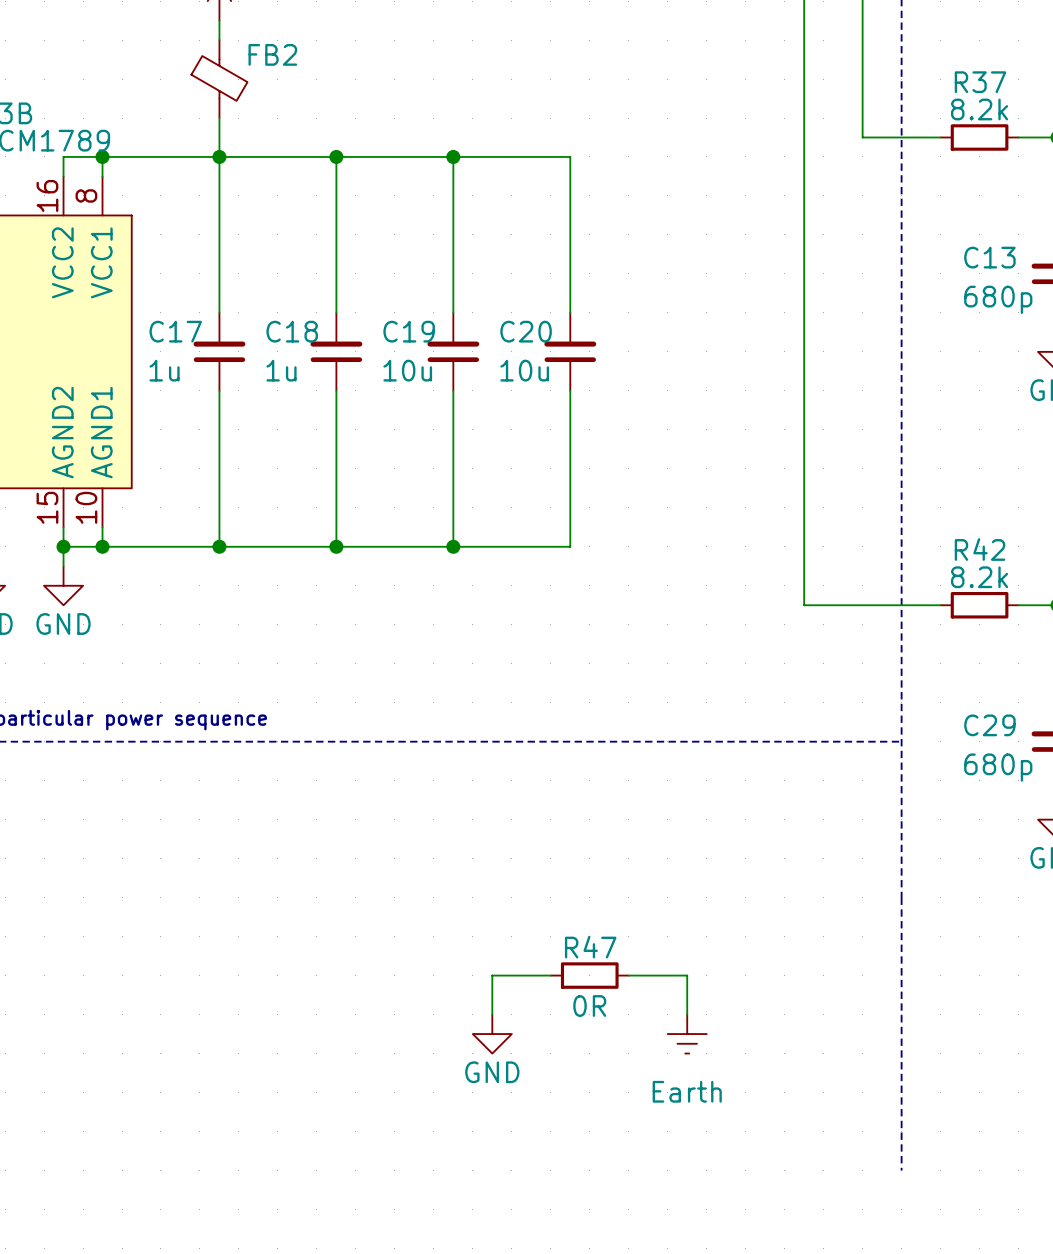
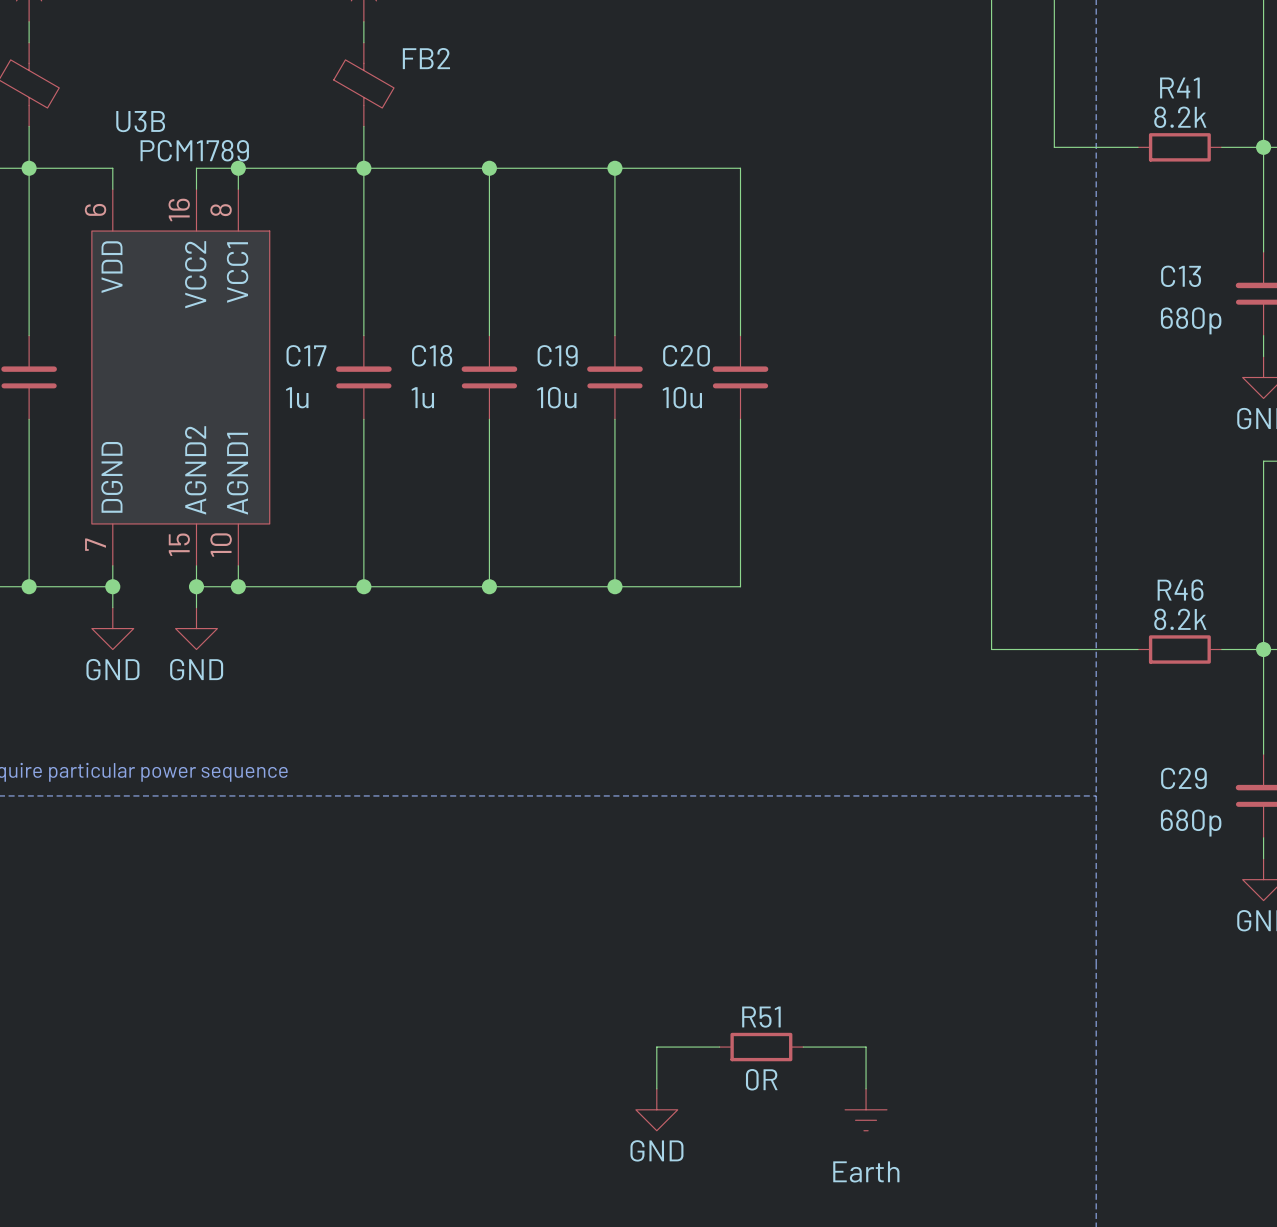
R37 name: R37 (980, 82) -> R41 (1179, 87)
R42 name: R42 (980, 549) -> R46 (1180, 590)
R47 name: R47 (590, 947) -> R51 (761, 1017)

